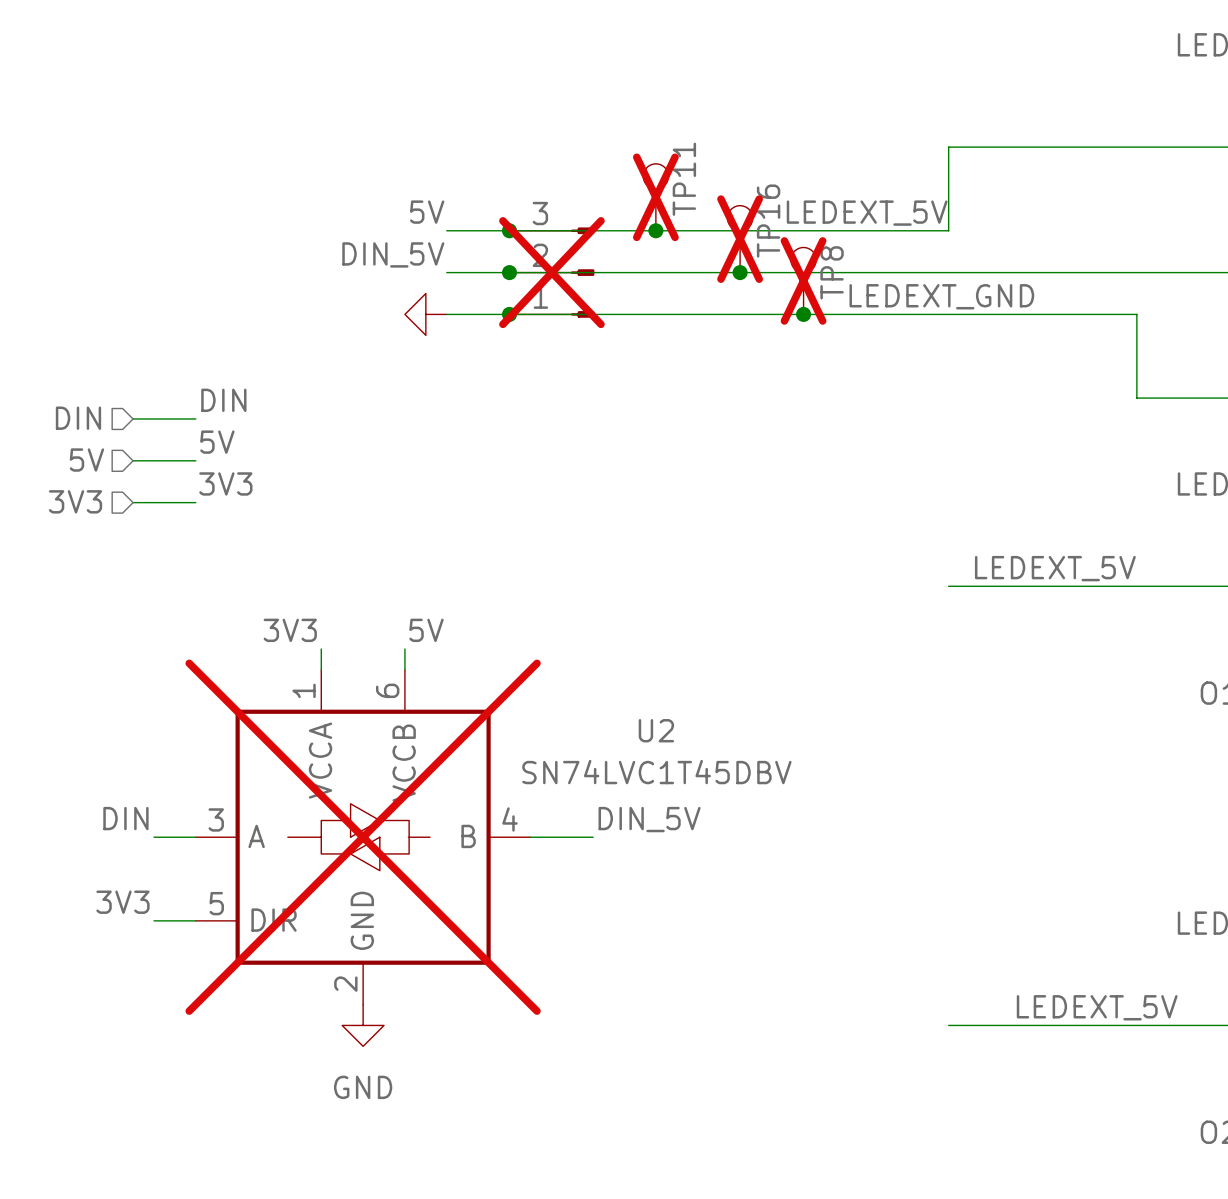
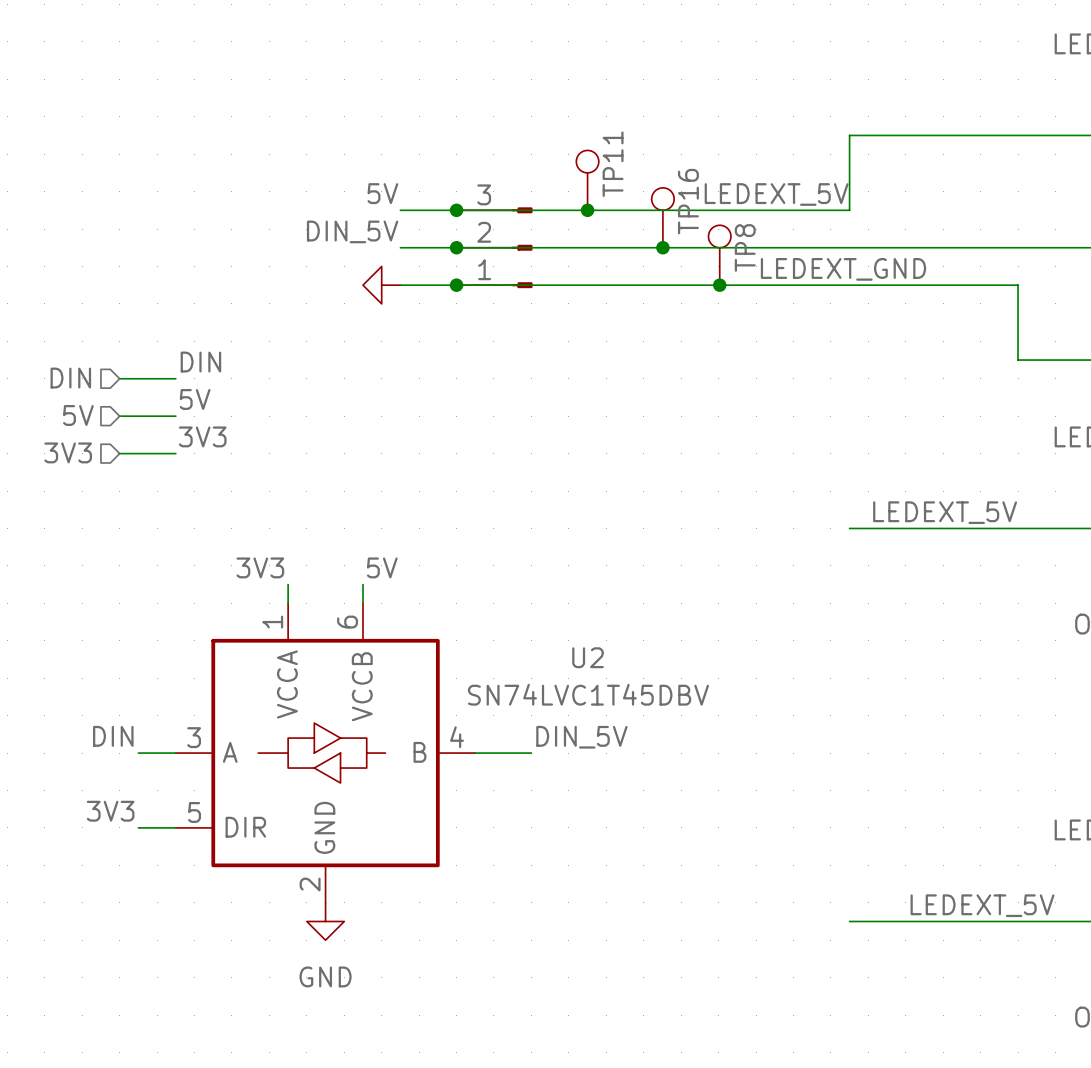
TP11 do-not-place cross: (655, 197) -> none
TP16 do-not-place cross: (740, 239) -> none
part do-not-place cross: (551, 272) -> none
TP8 do-not-place cross: (803, 280) -> none
U2 do-not-place cross: (363, 837) -> none

